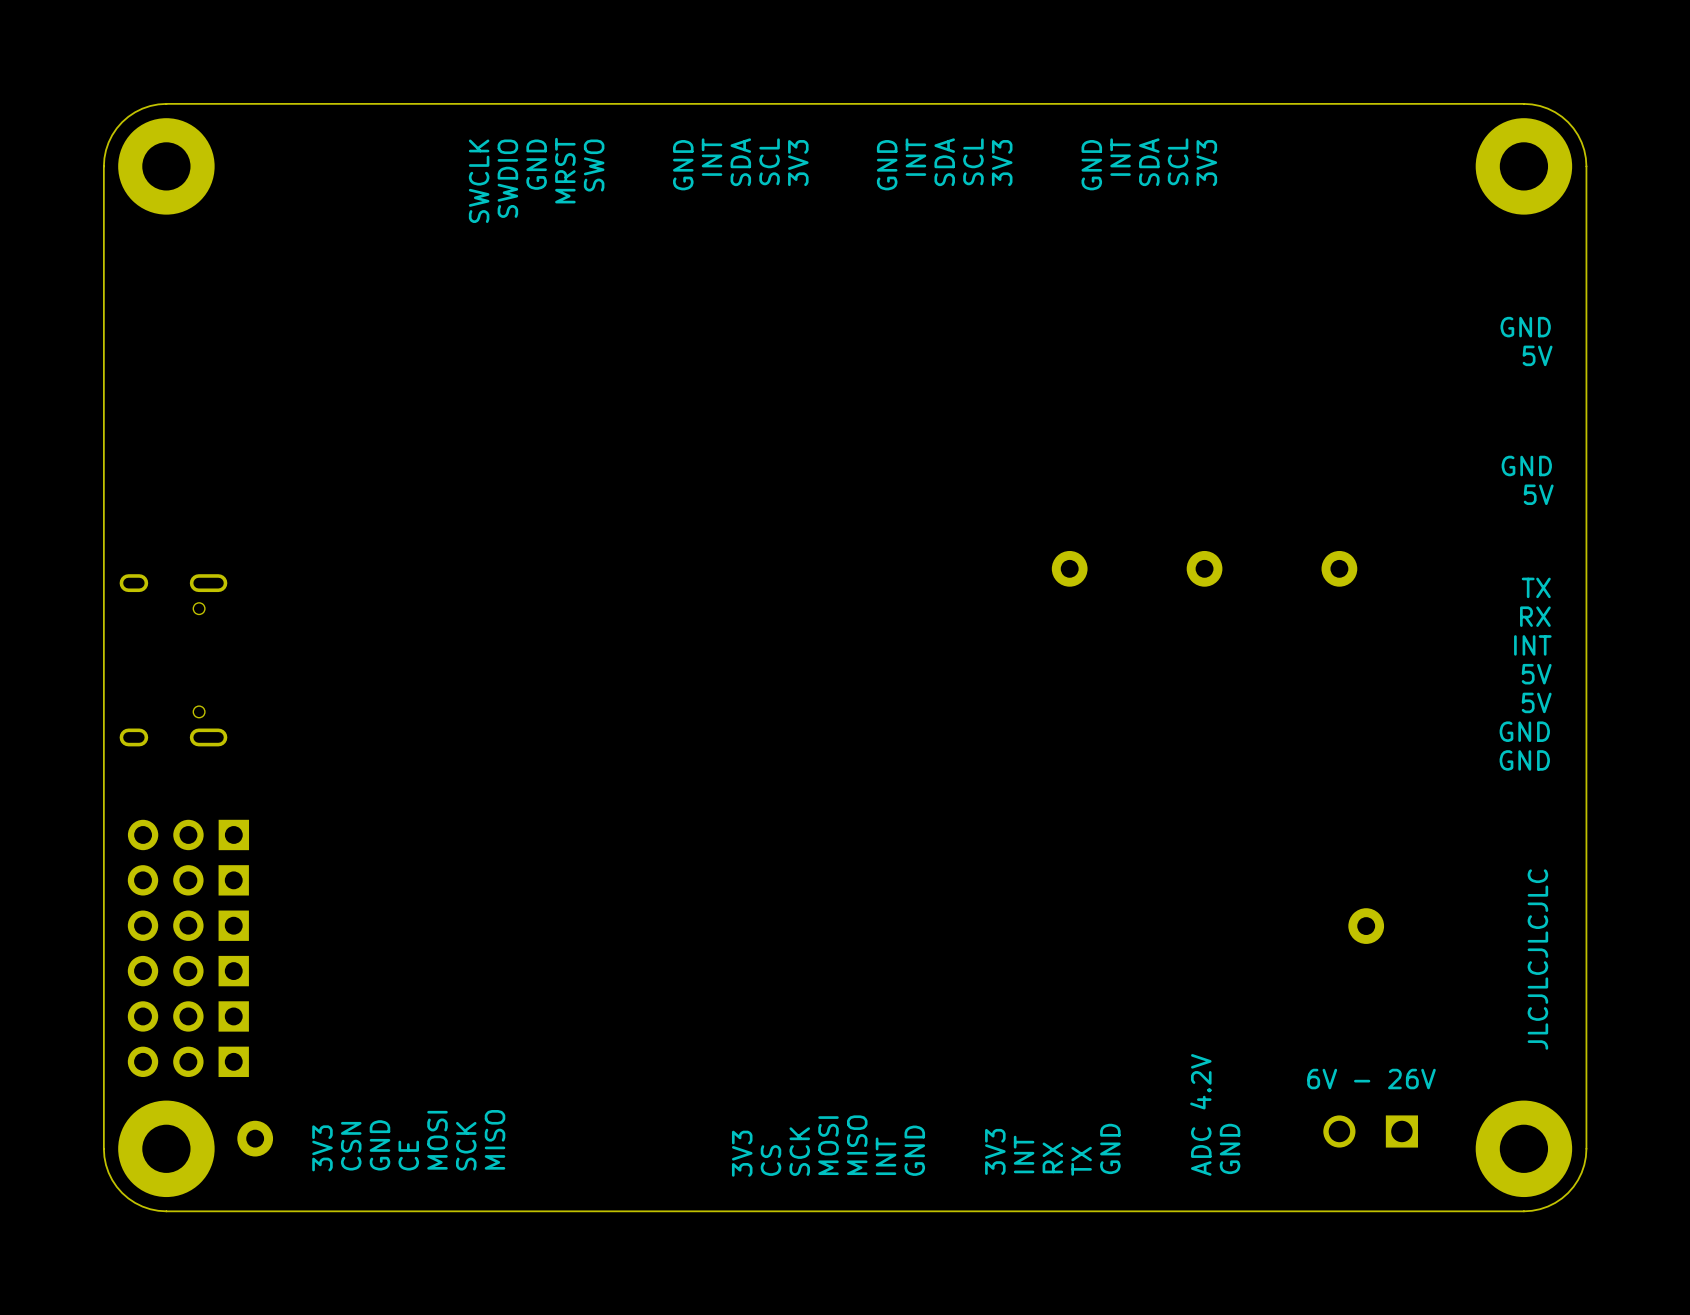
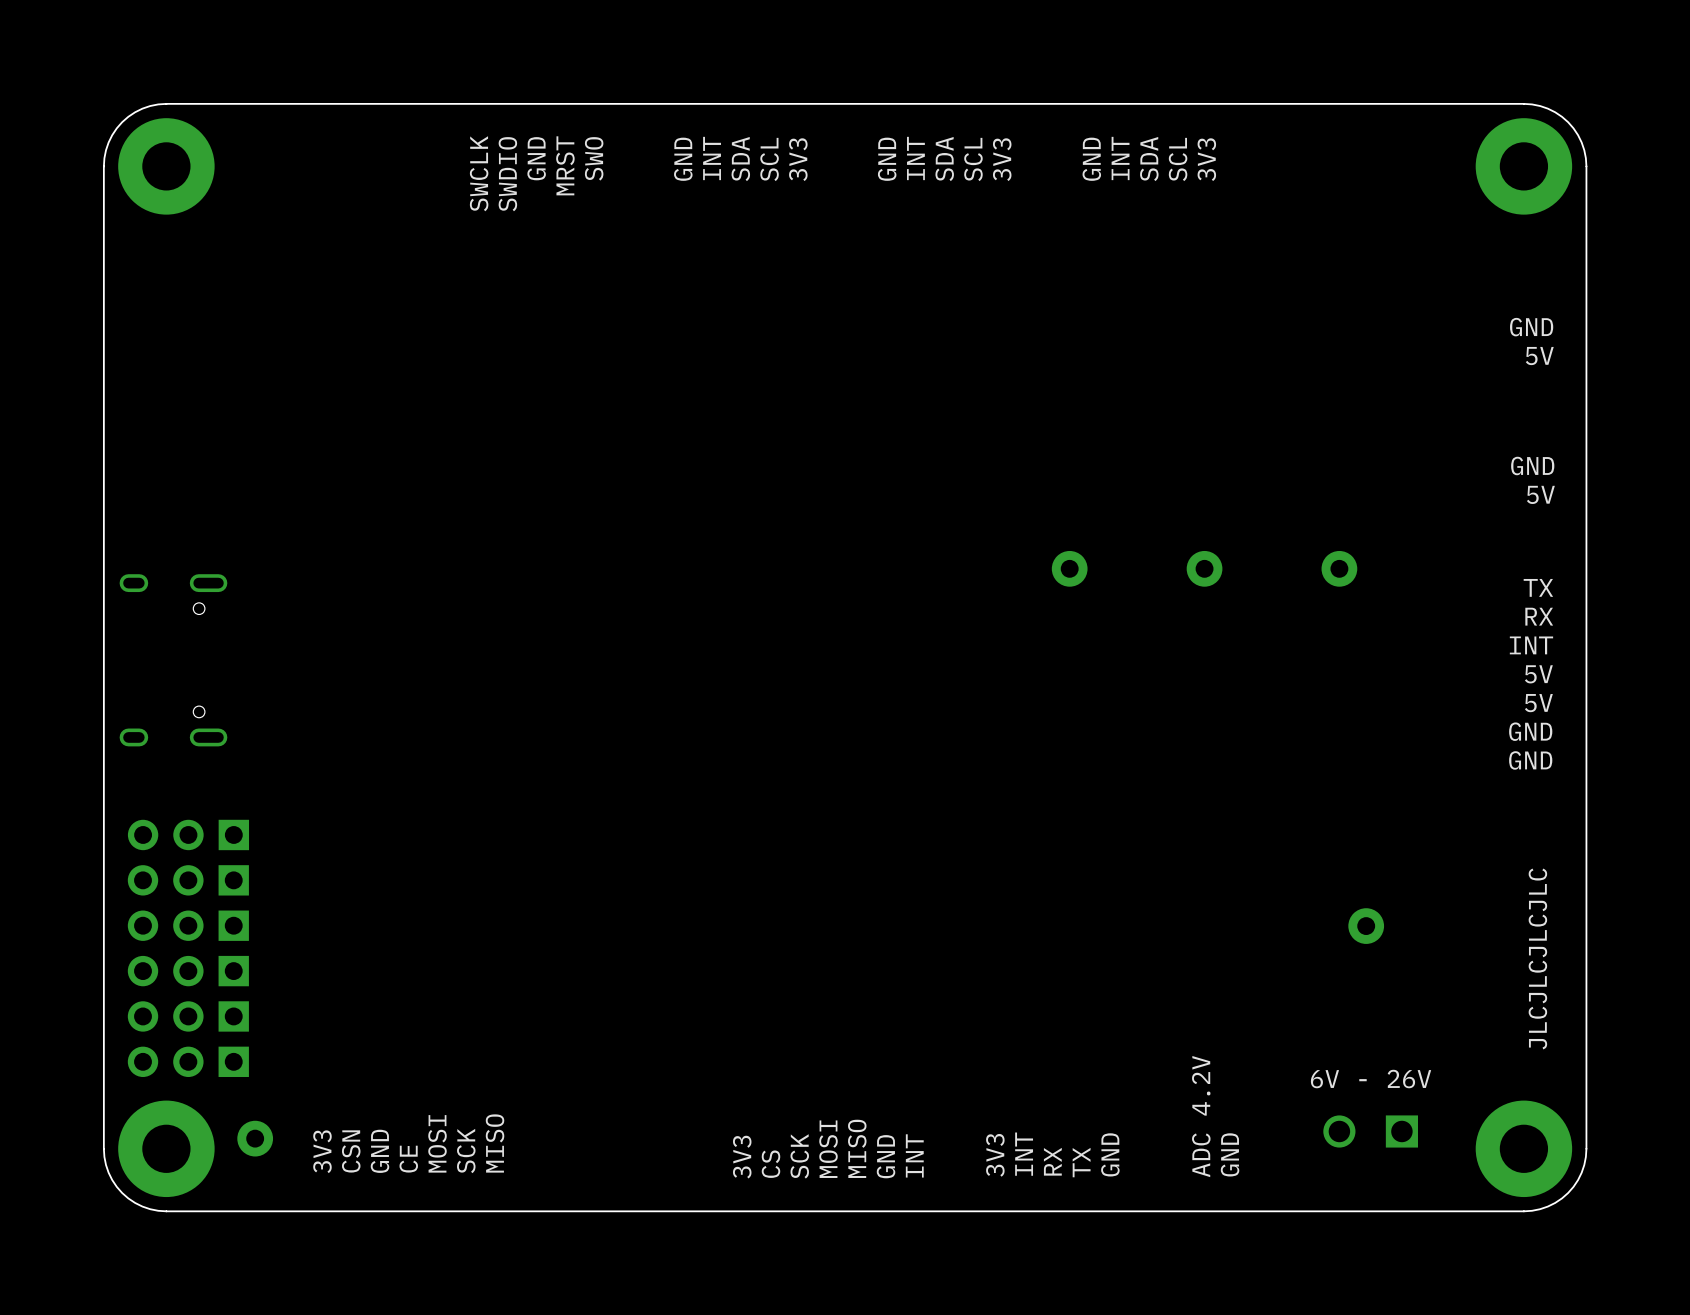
text: GND (914, 1150) -> INT (914, 1155)
text: INT (886, 1156) -> GND (886, 1156)

